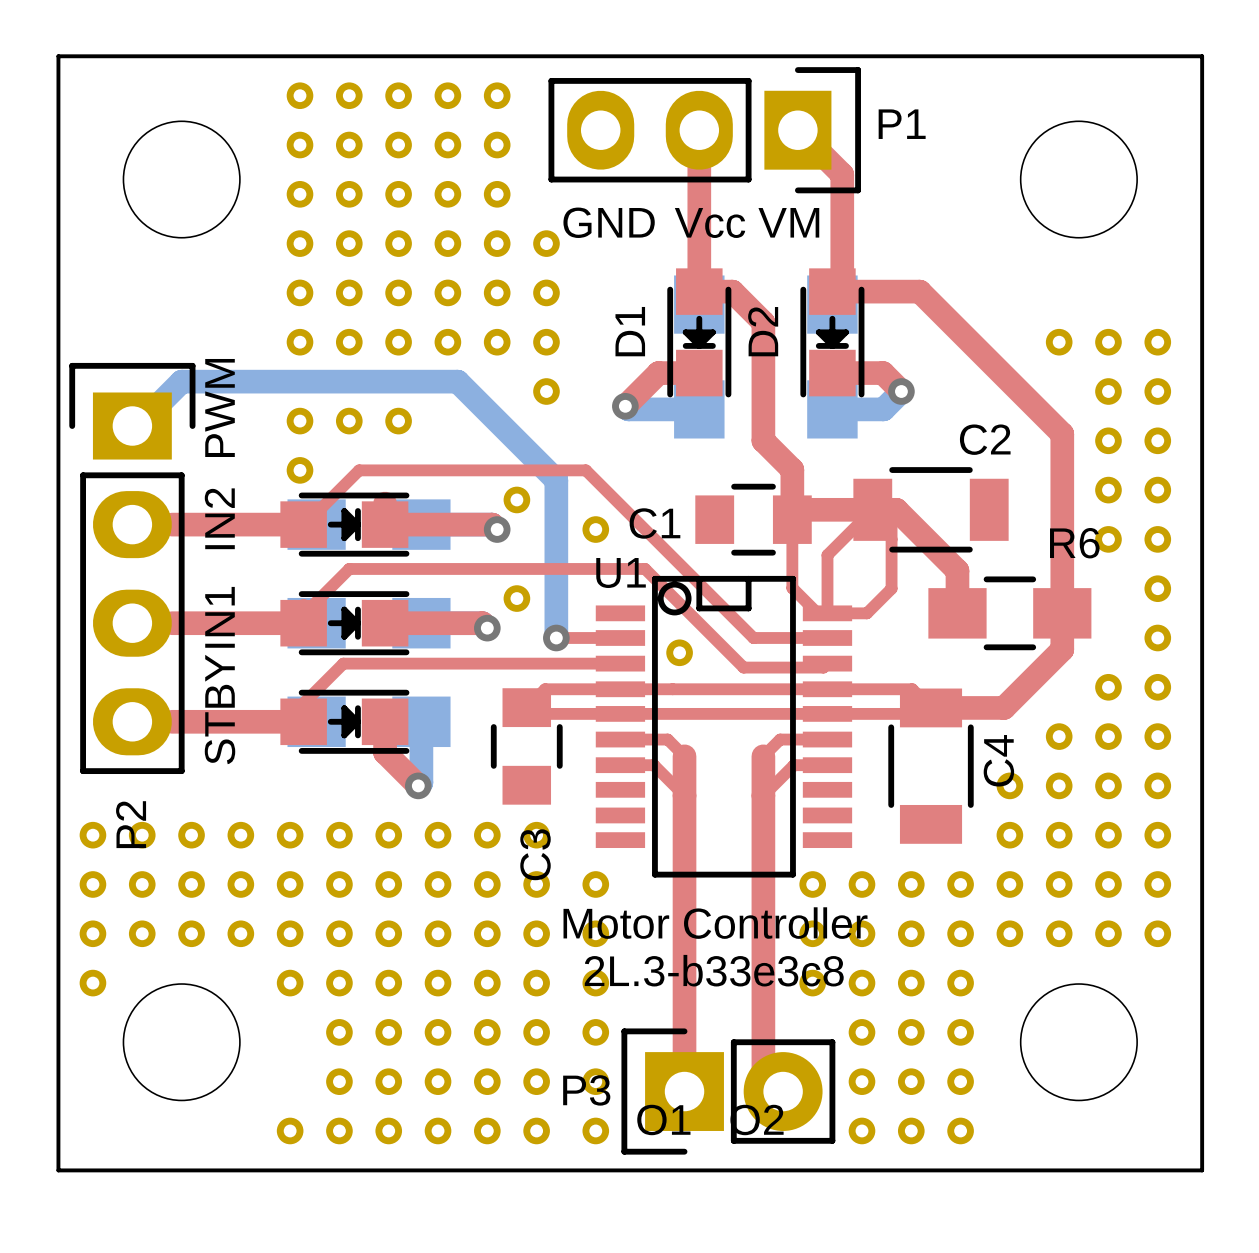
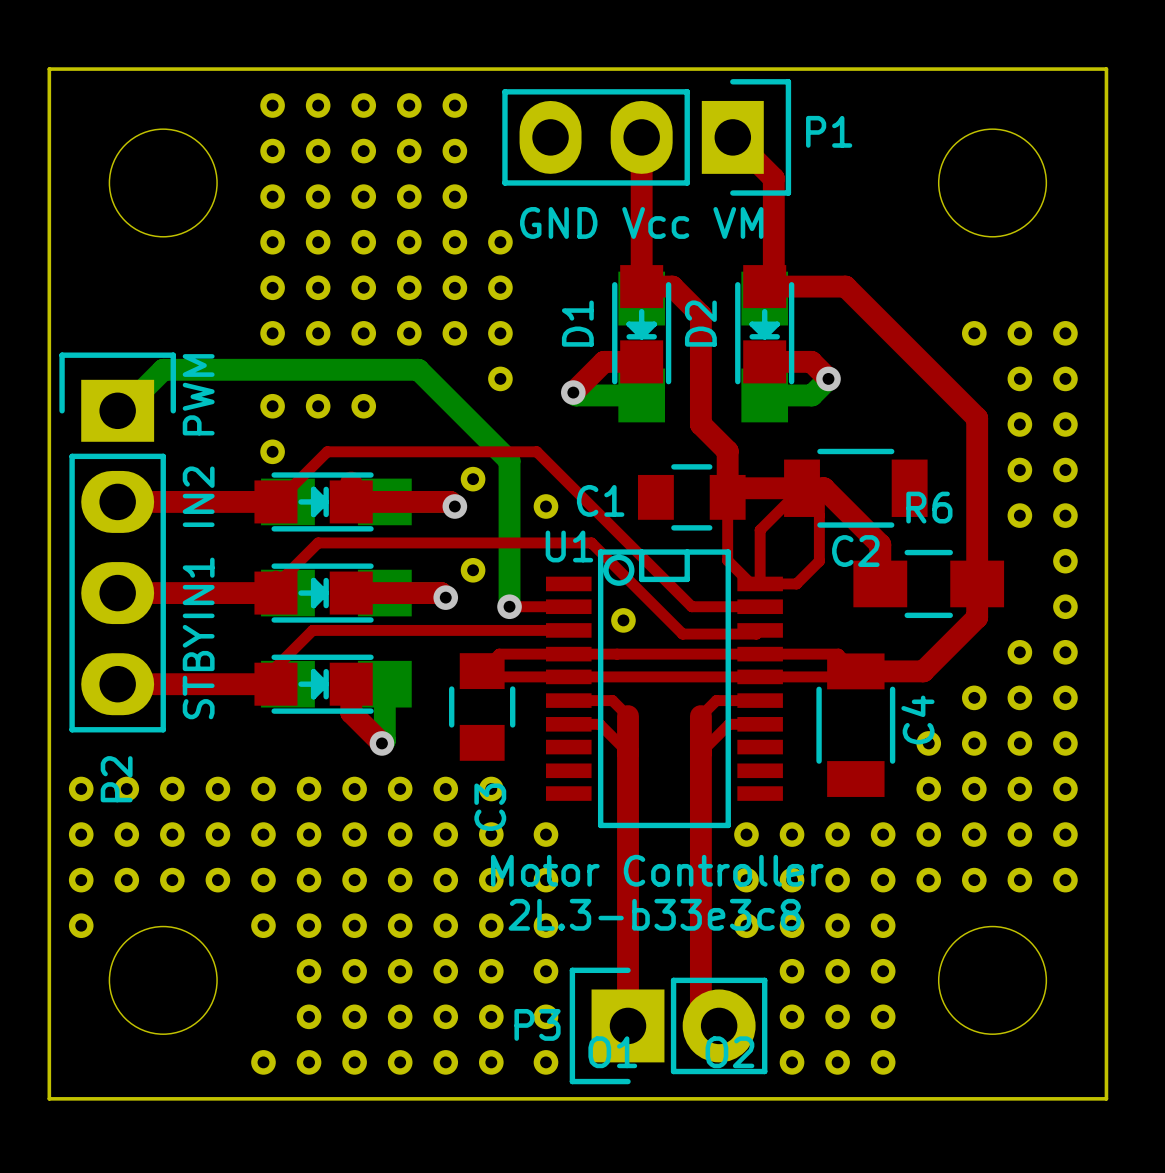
C2 name position: C2 (985, 439) -> C2 (855, 551)
R6 name position: R6 (1074, 543) -> R6 (929, 507)

